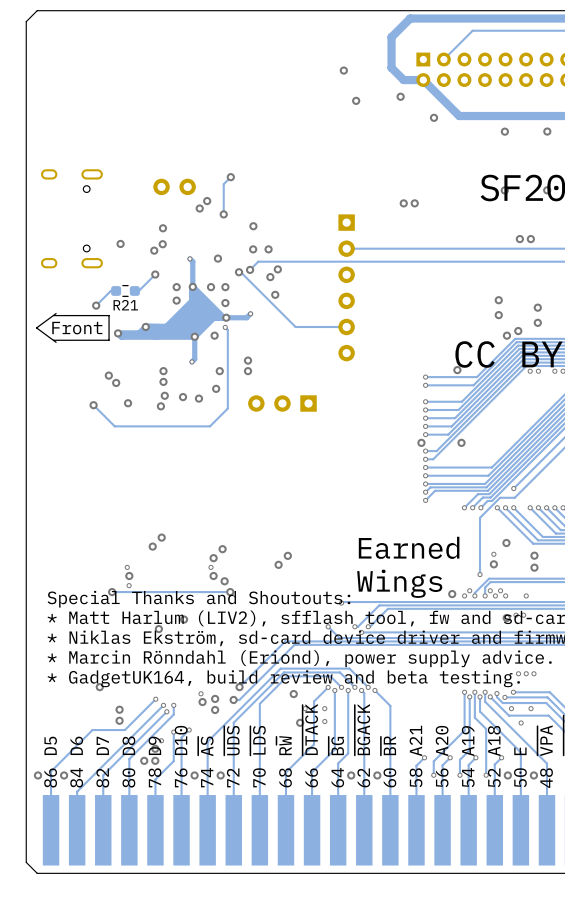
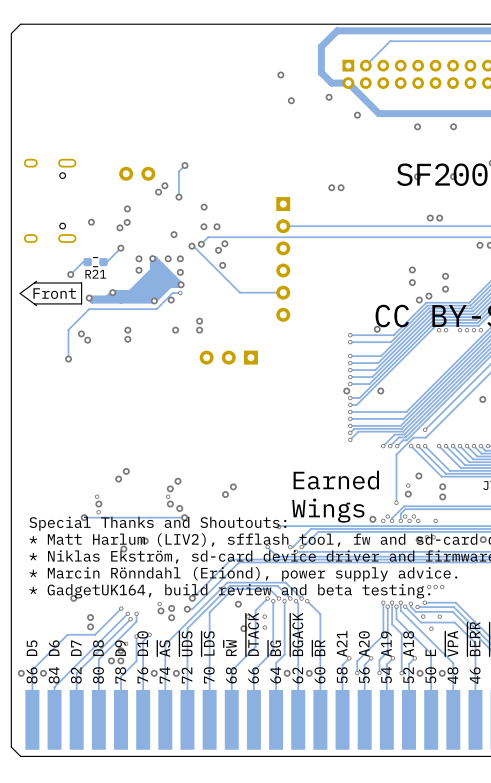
track: (189, 258) (192, 261) (192, 286) (223, 317) -> none
via: (189, 258) -> none
track: (250, 313) (246, 317) (226, 317) -> (152, 258) (154, 258) (181, 284)
via: (250, 313) -> none
track: (225, 327) (227, 329) (227, 408) (210, 426) (114, 426) (93, 405) -> (180, 293) (172, 293) (156, 309) (89, 309) (68, 329) (68, 359)
track: (194, 336) (194, 359) (192, 361) -> none
via: (192, 361) -> none
via: (216, 388) -> none
via: (164, 395) -> none
via: (183, 397) -> none
via: (198, 398) -> none
via: (128, 403) -> none
via: (160, 406) -> none

